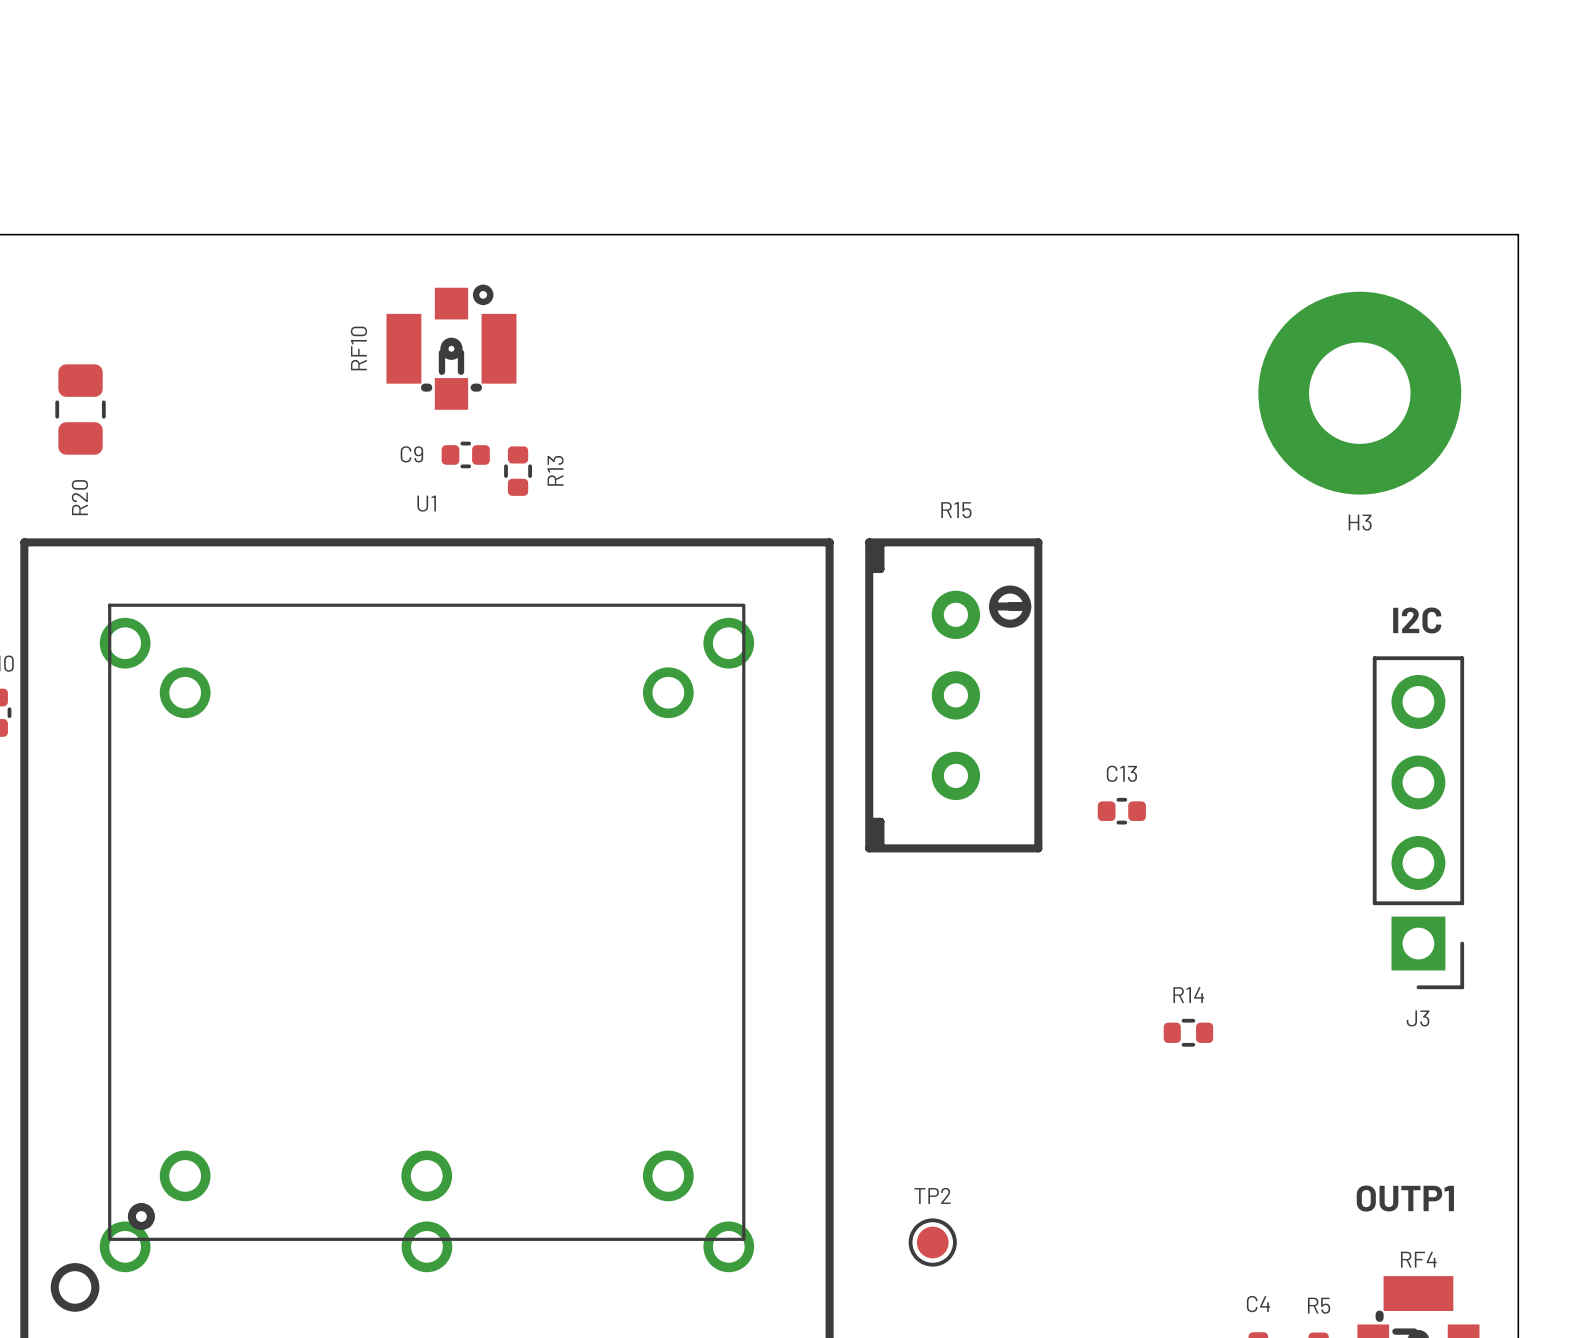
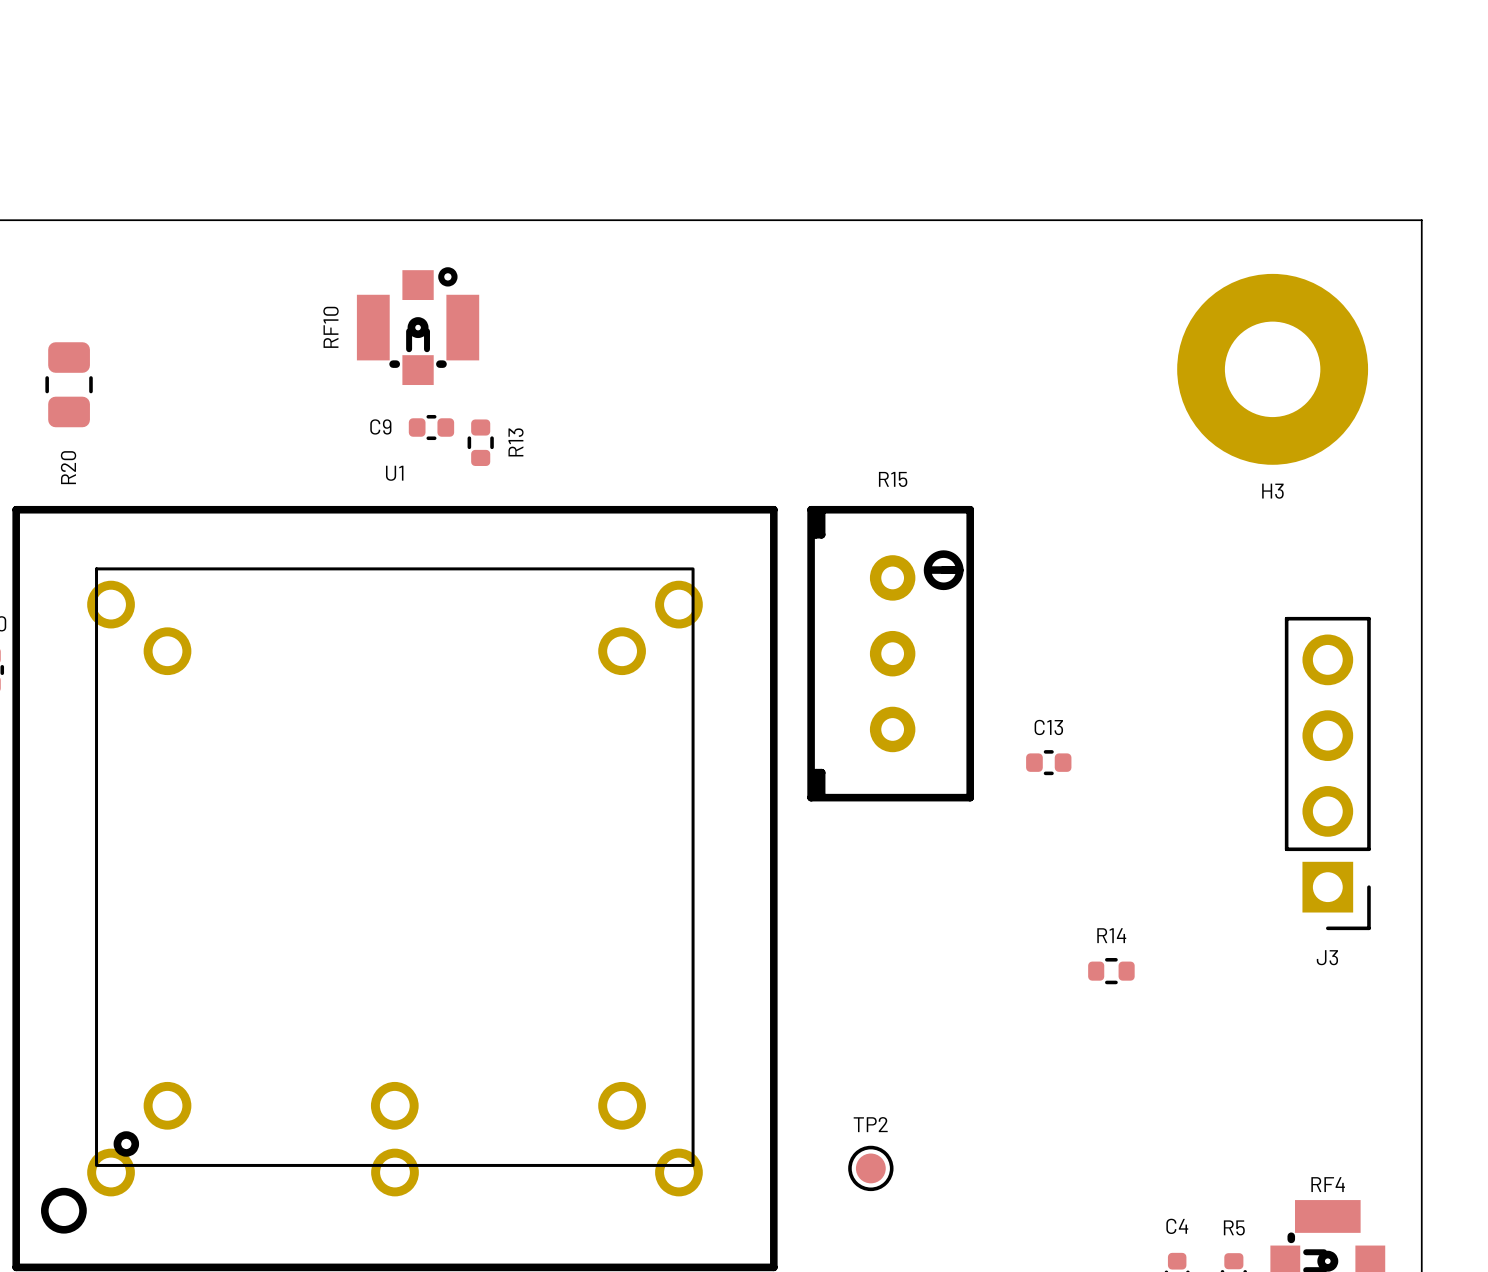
text: I2C (1417, 620) -> none
text: OUTP1 (1405, 1198) -> none

